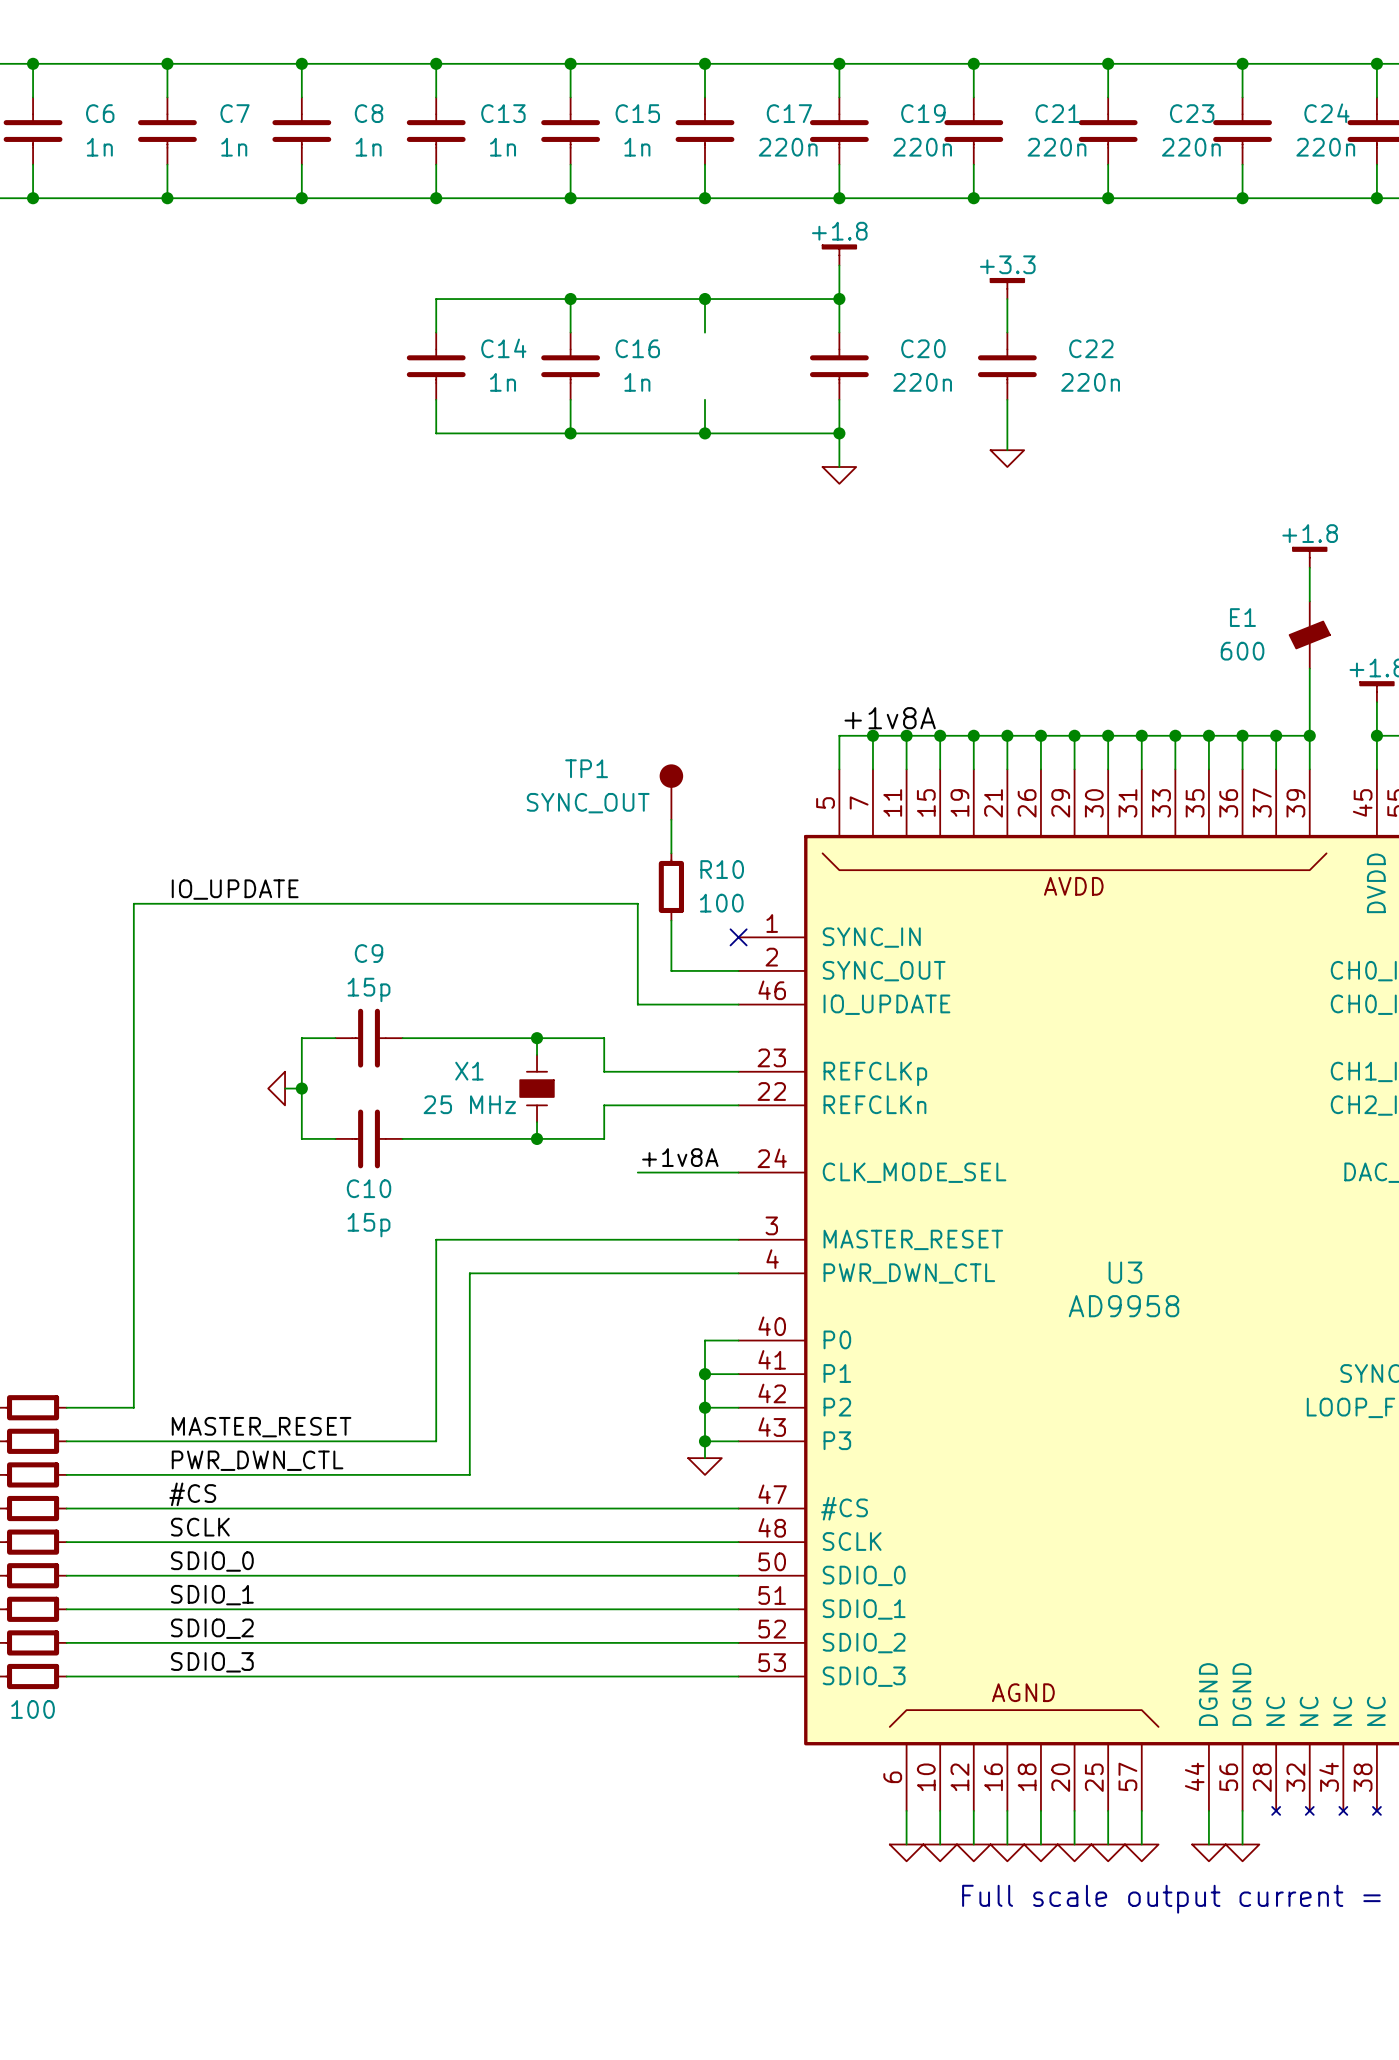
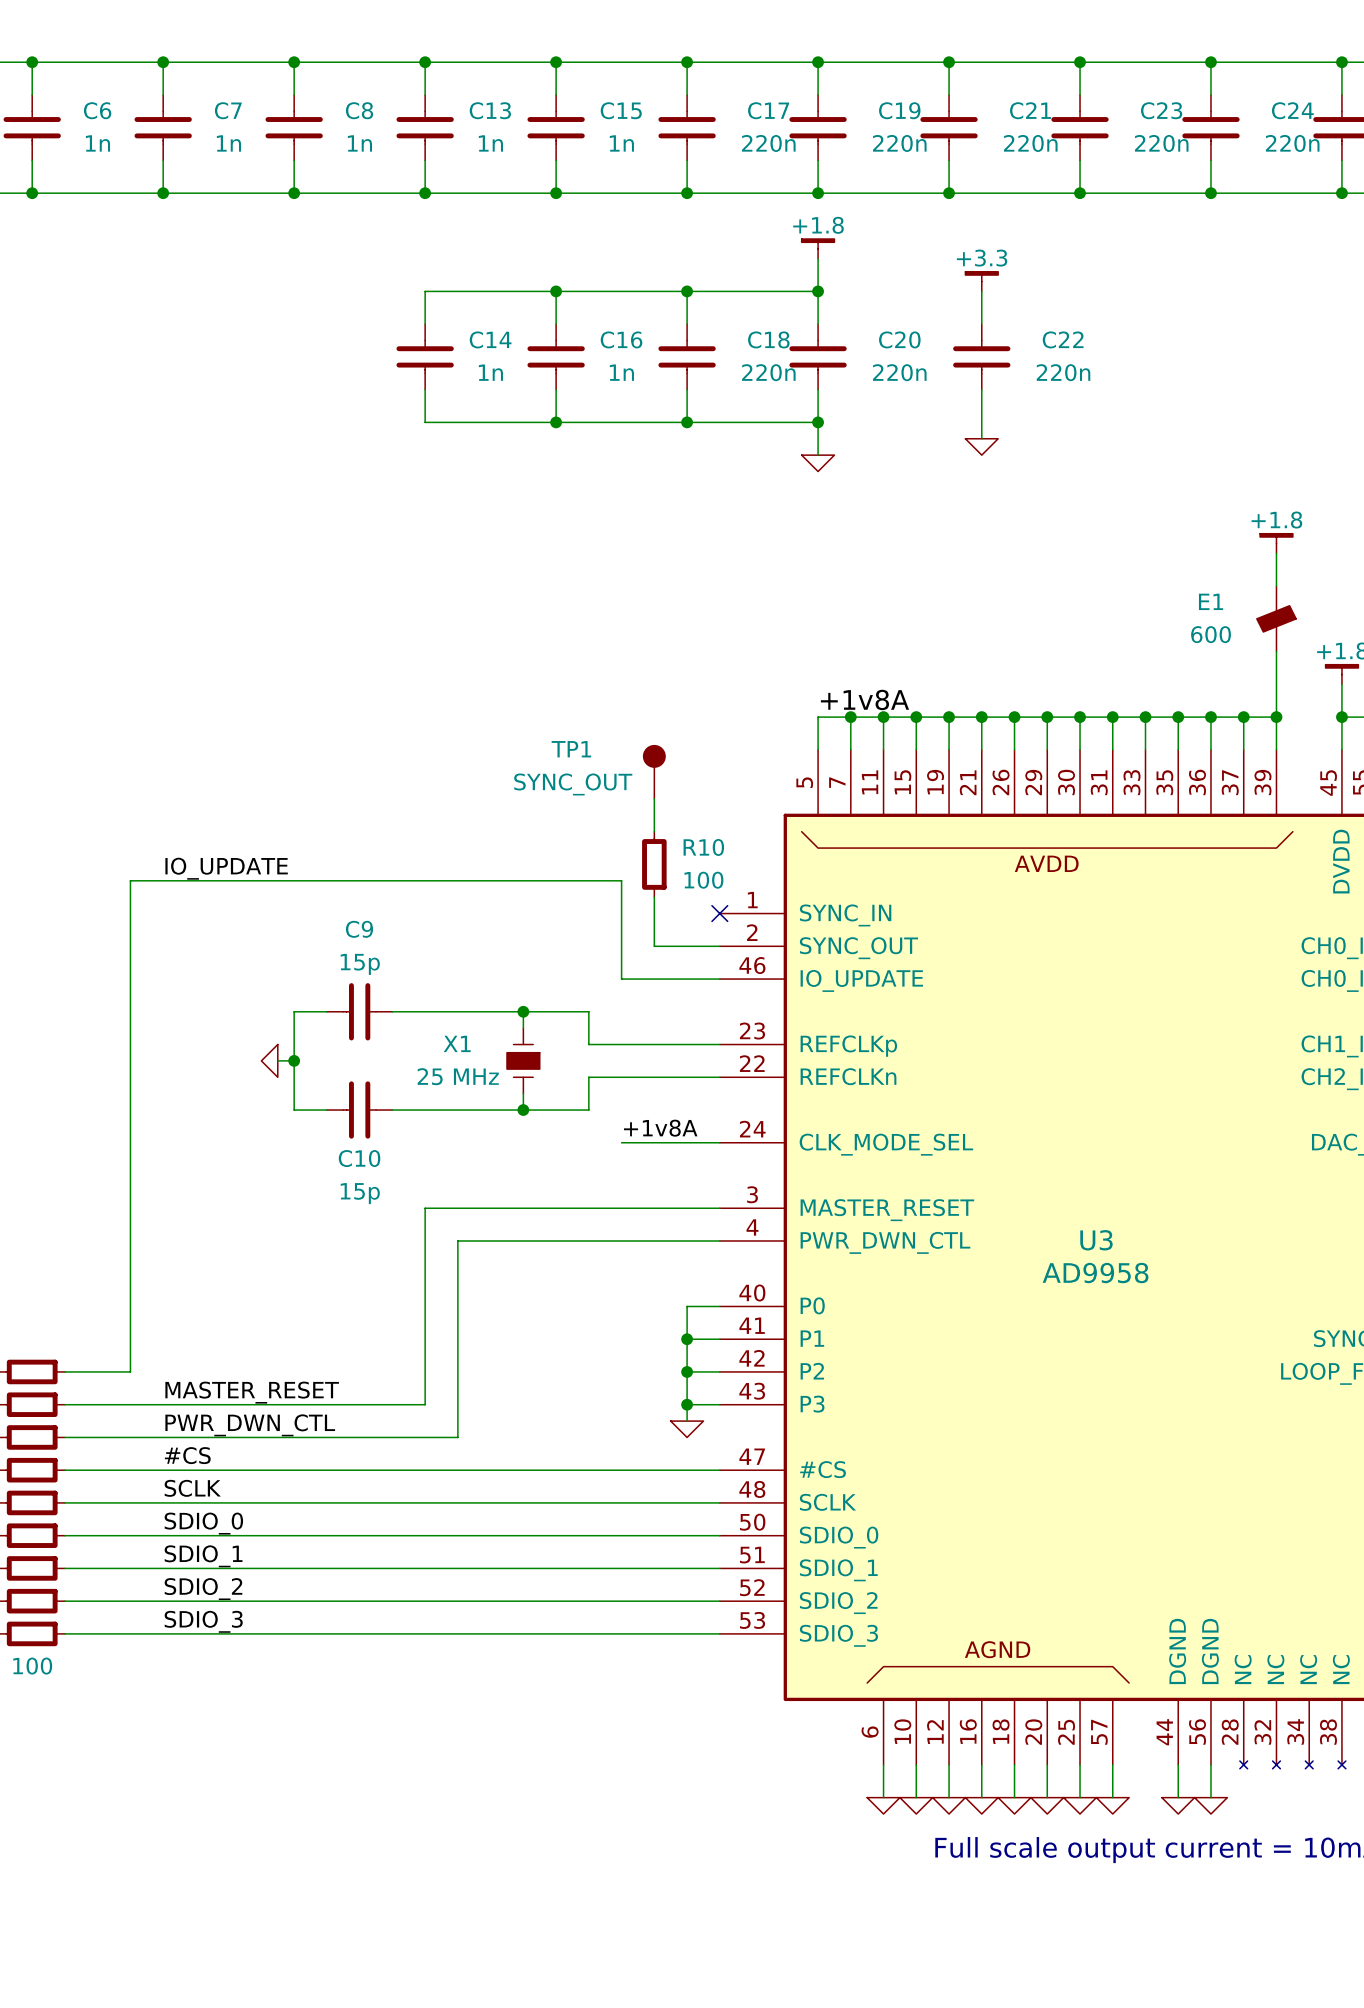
C18: none -> 220n (687, 356)

